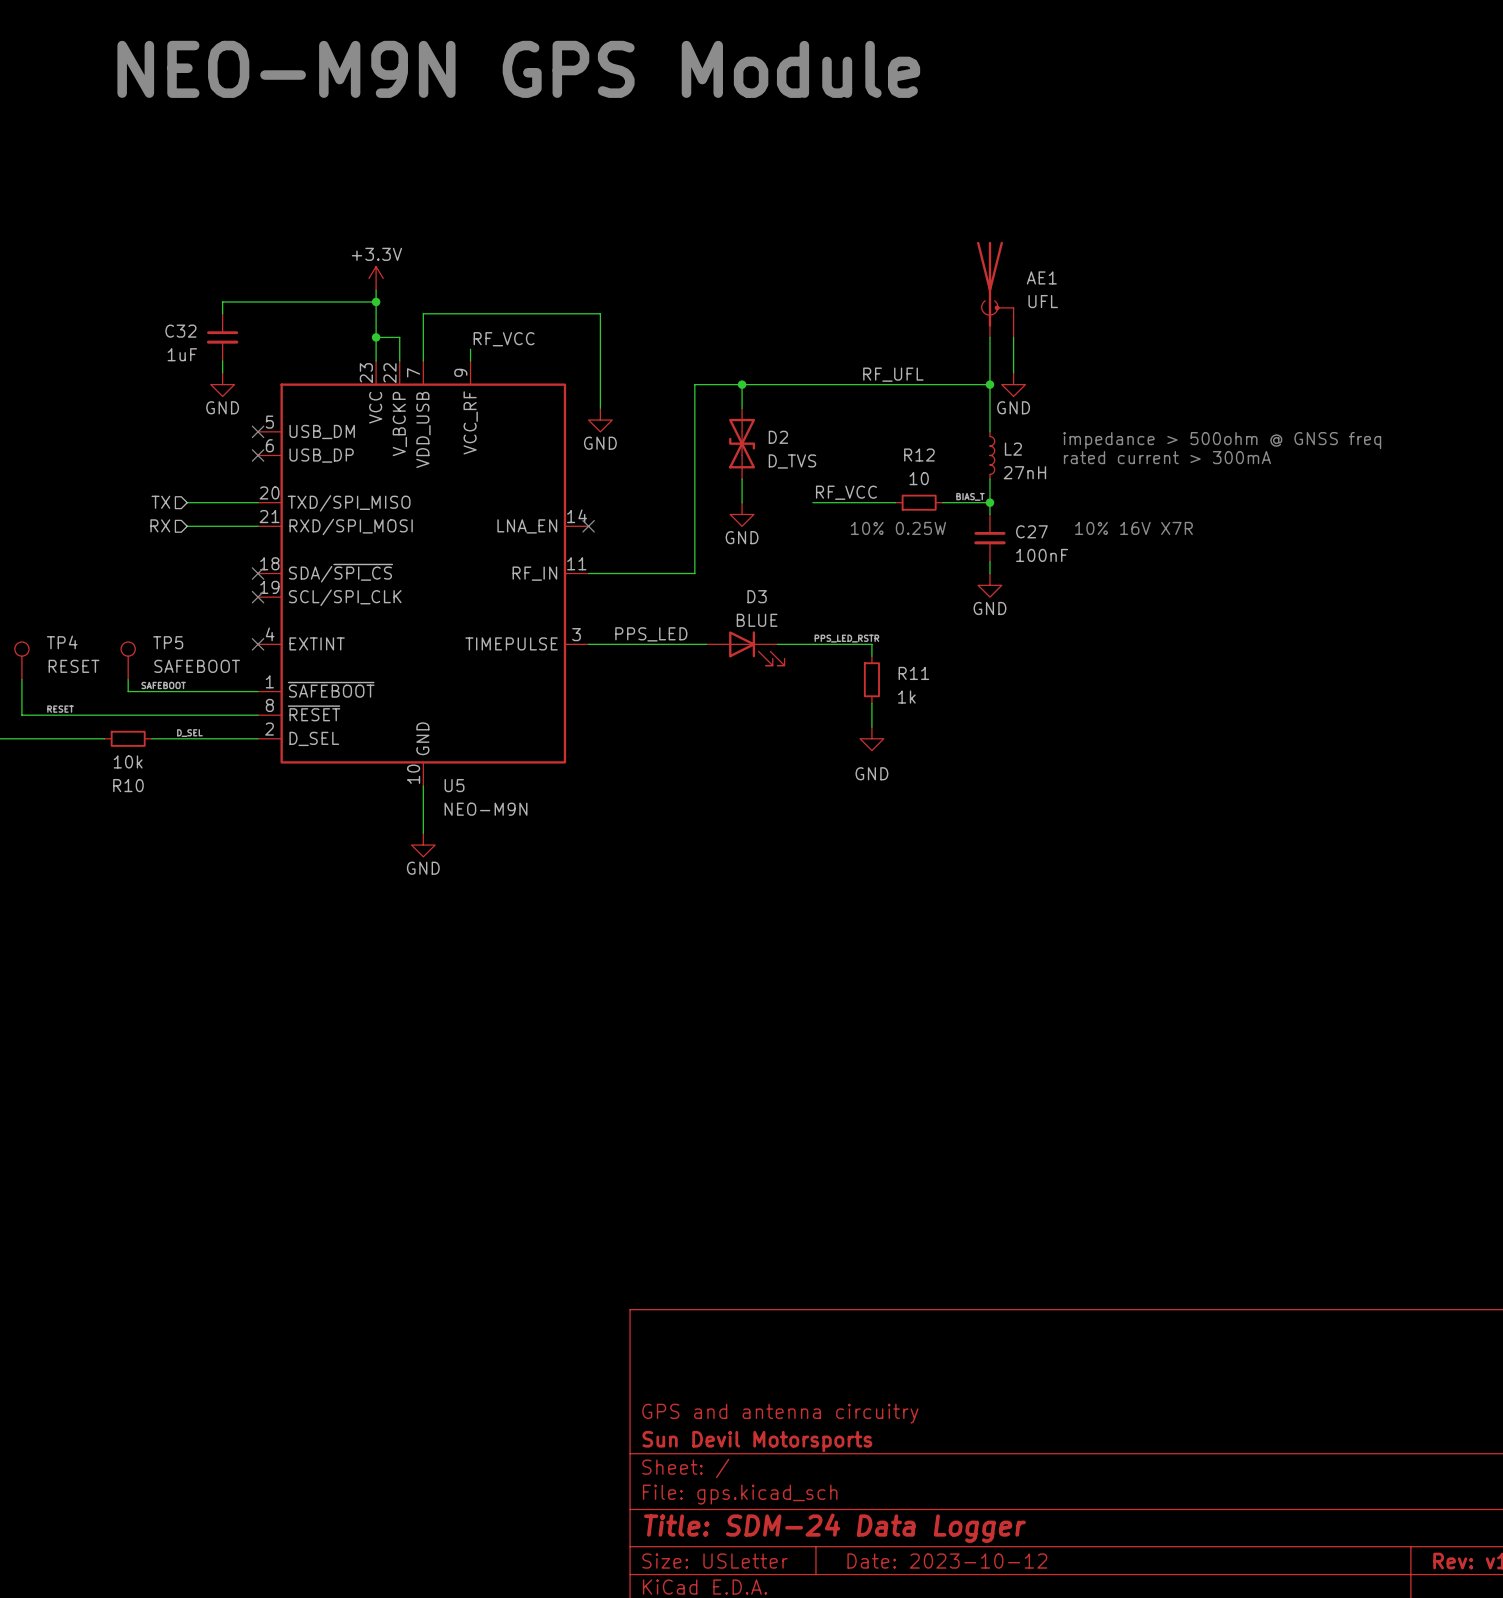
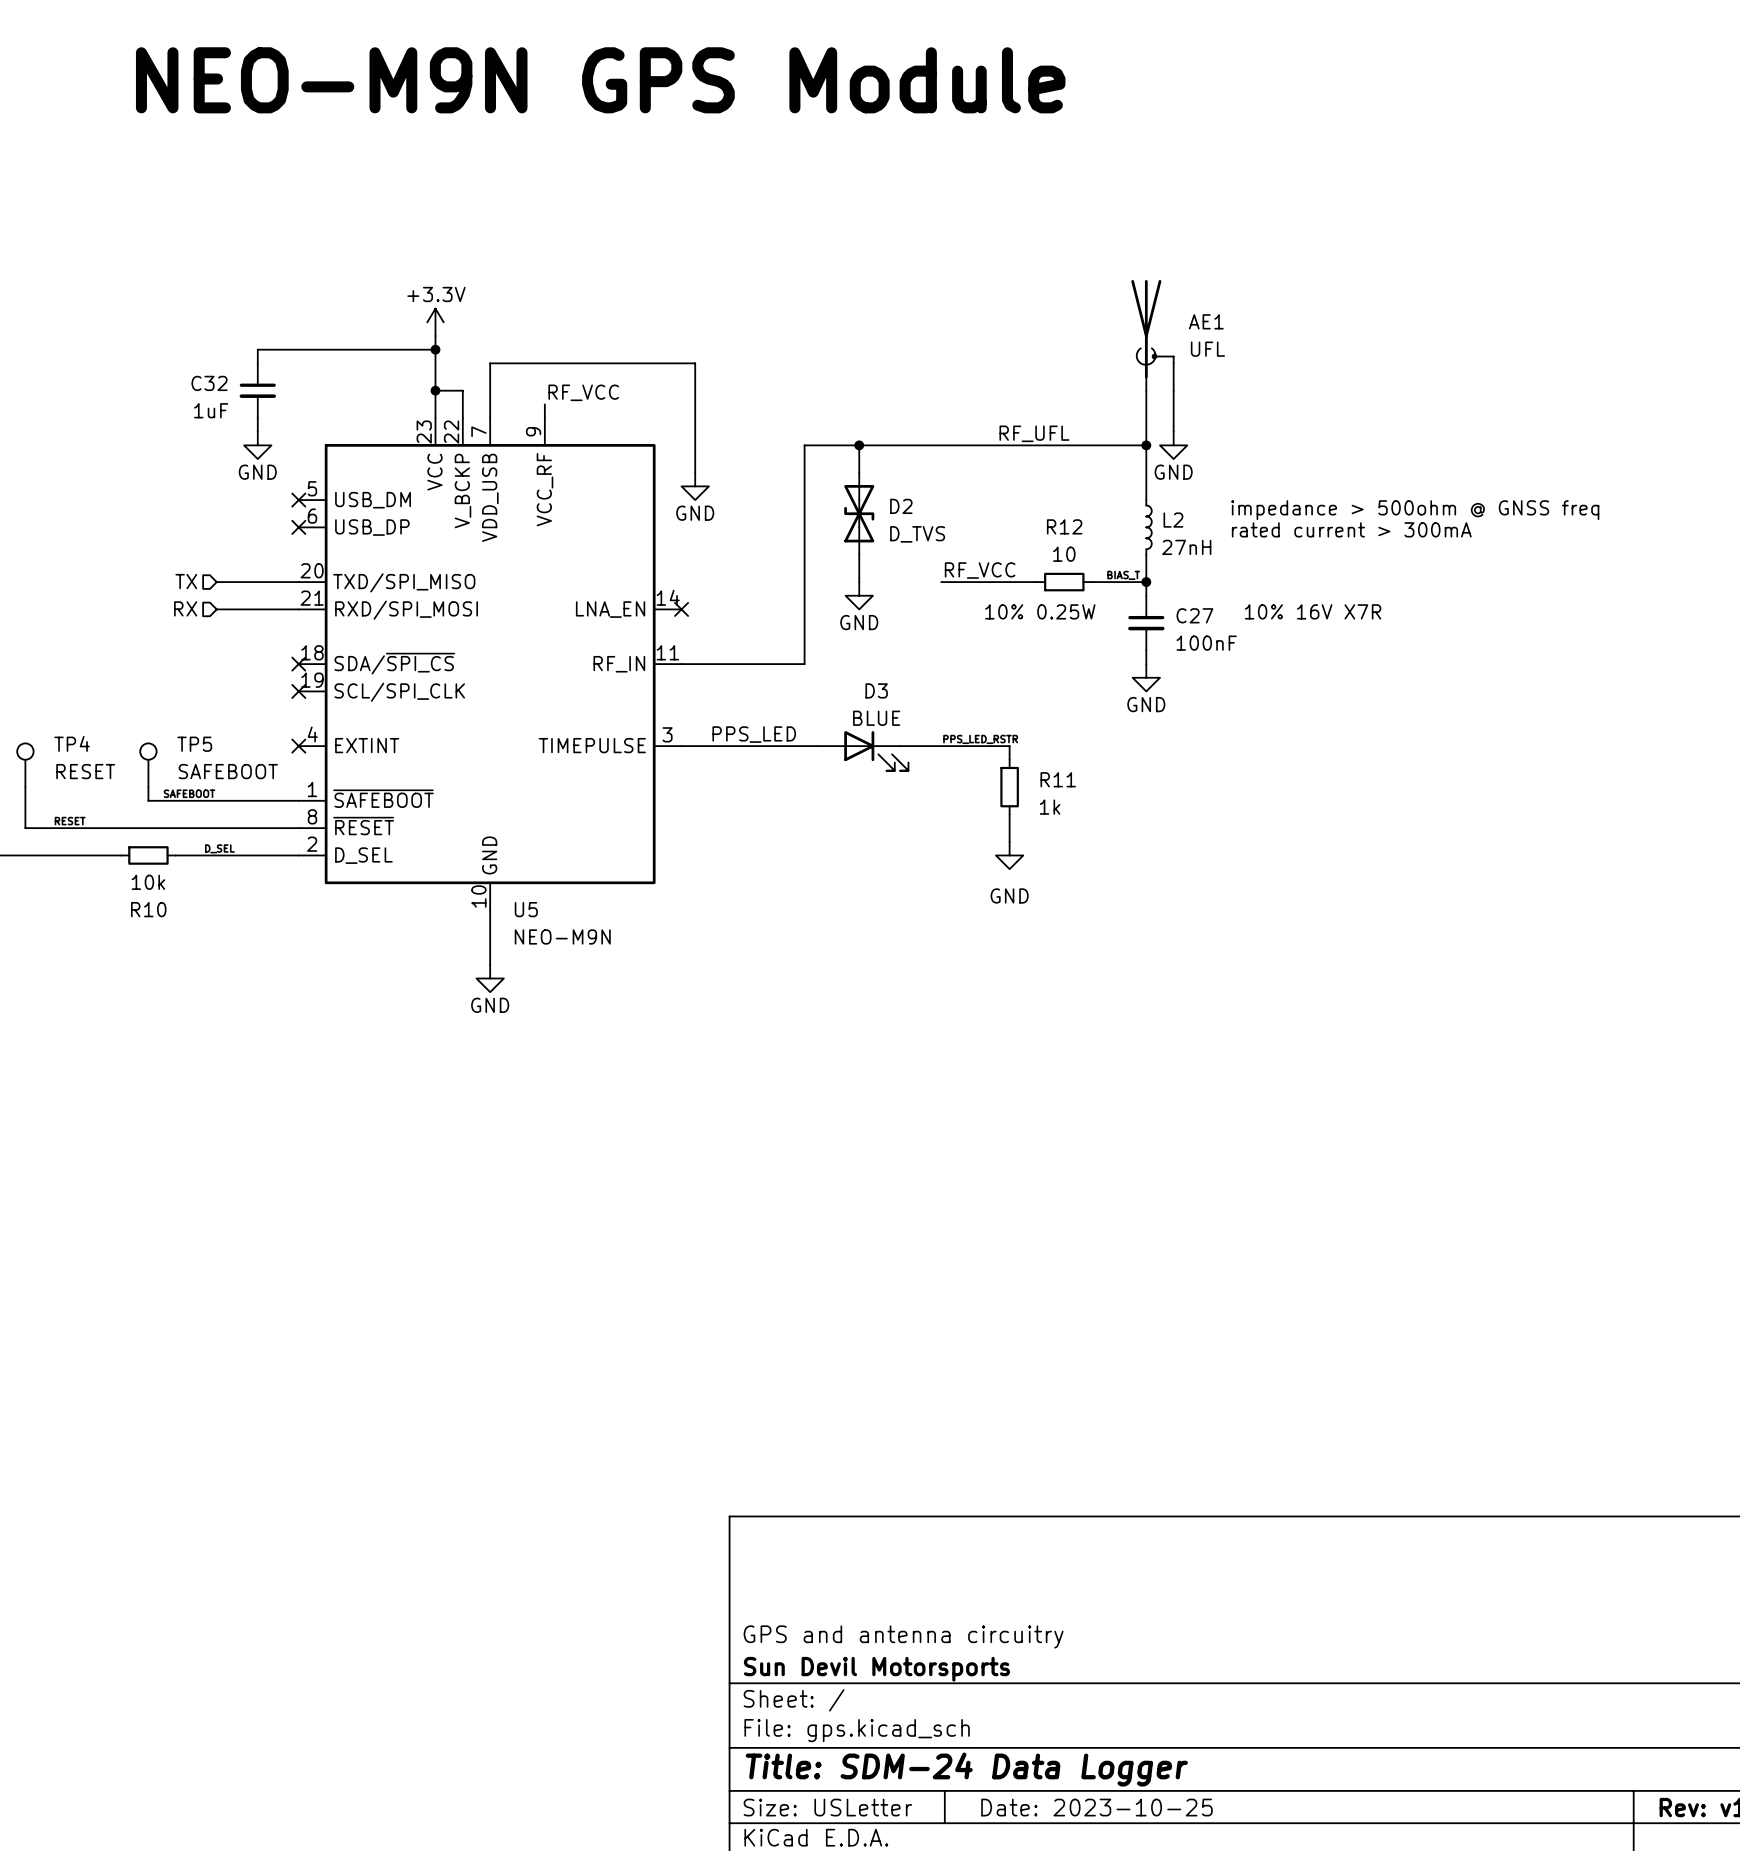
title block: Date: 2023-10-12 (947, 1561) -> Date: 2023-10-25 (1096, 1807)

